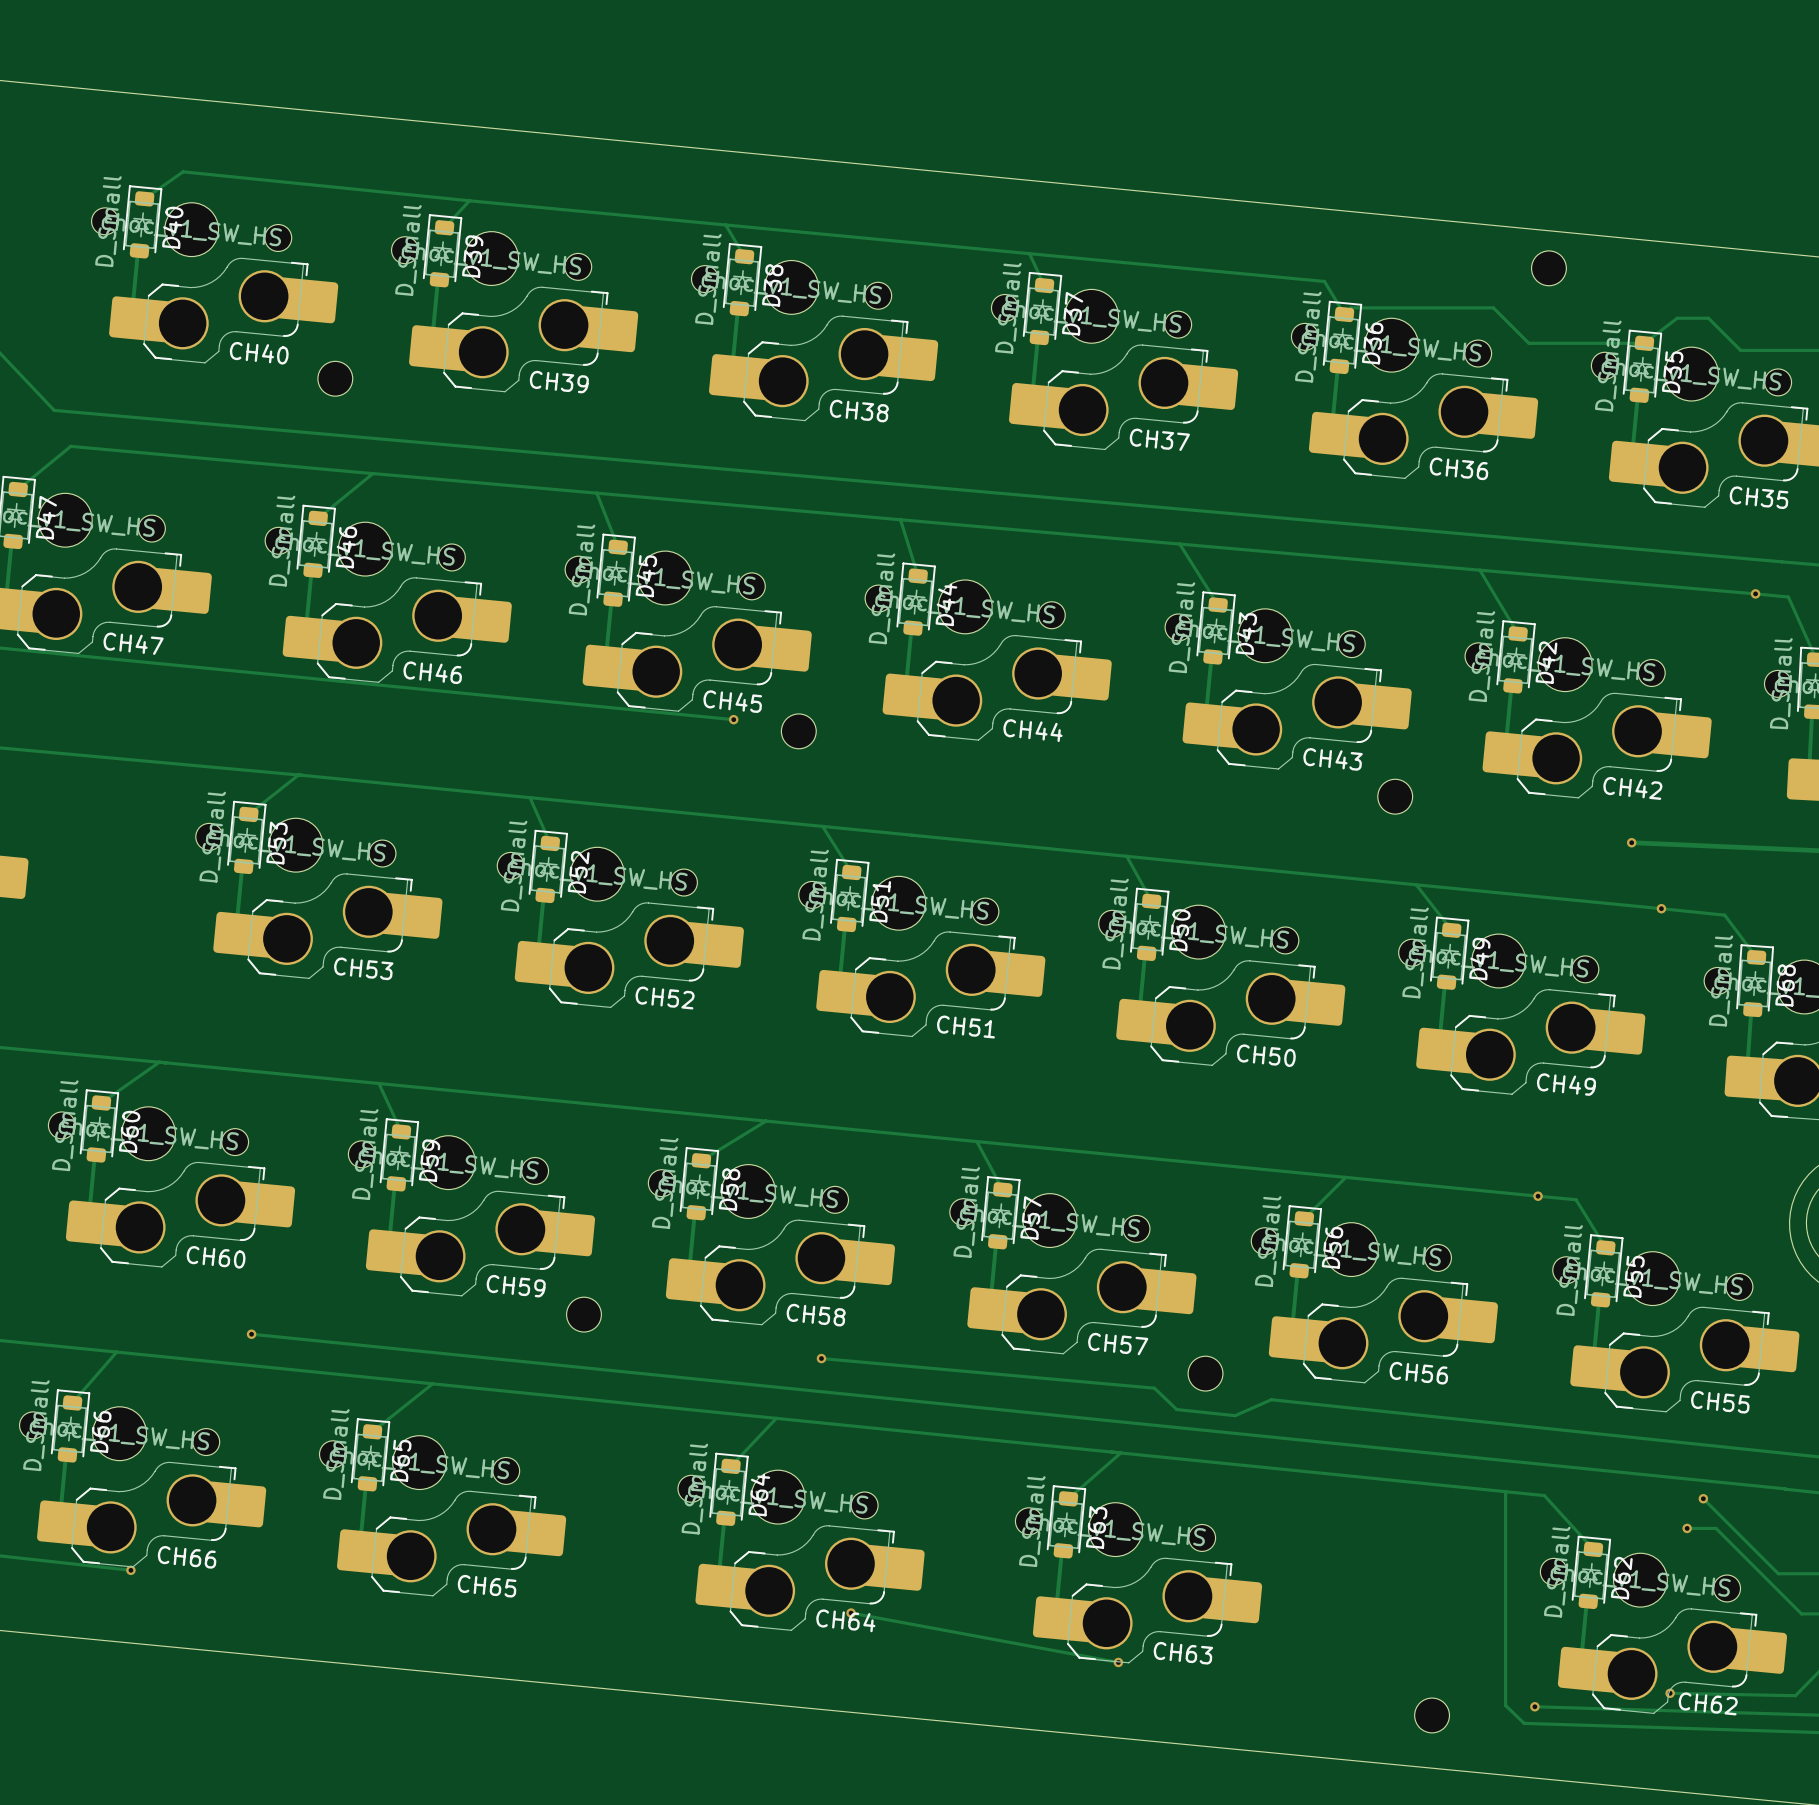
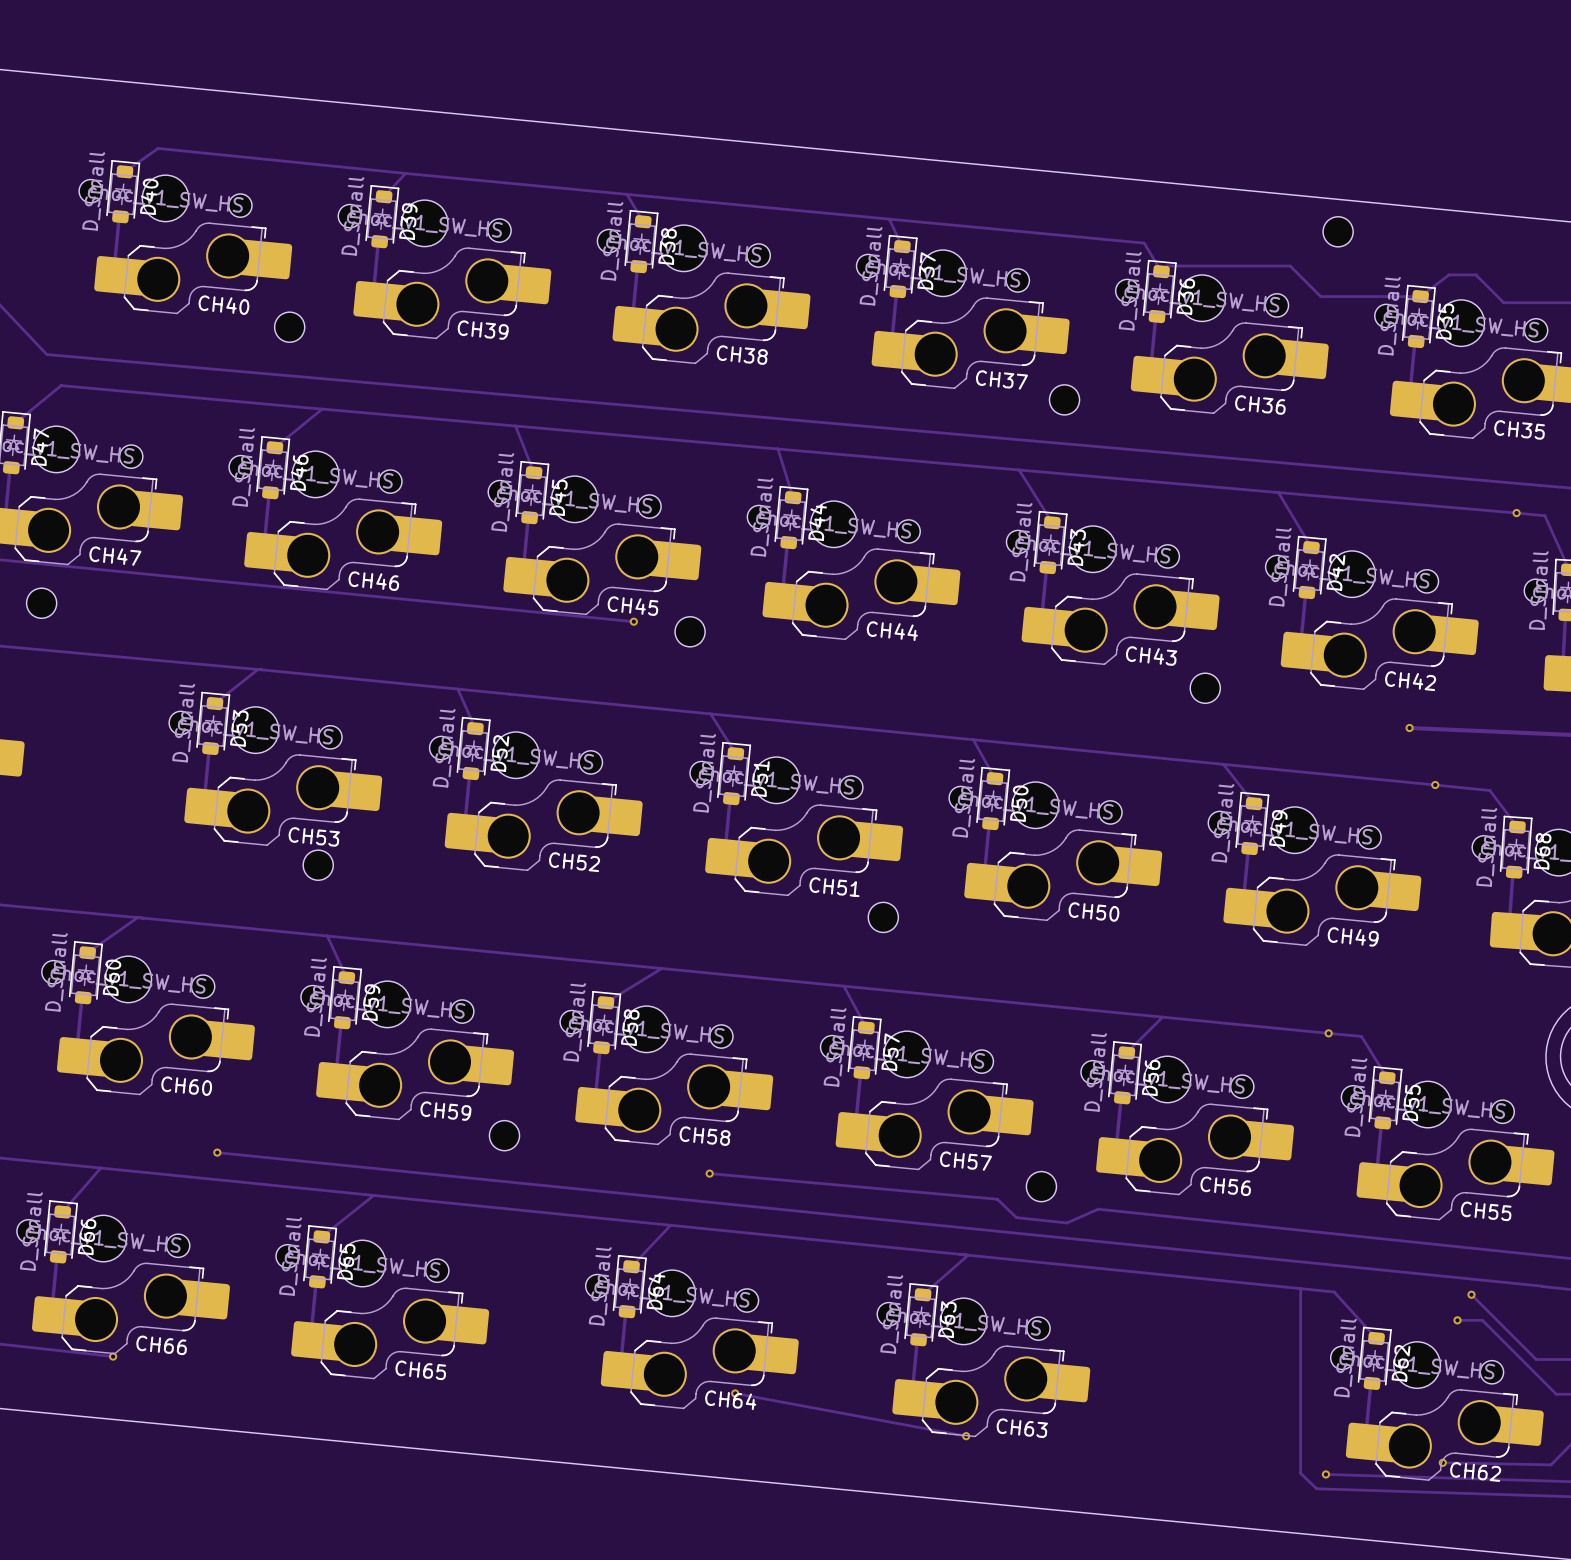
part: none -> (1064, 399)
part: none -> (41, 603)
part: none -> (318, 865)
part: none -> (883, 917)
part: (1432, 1715) -> none

